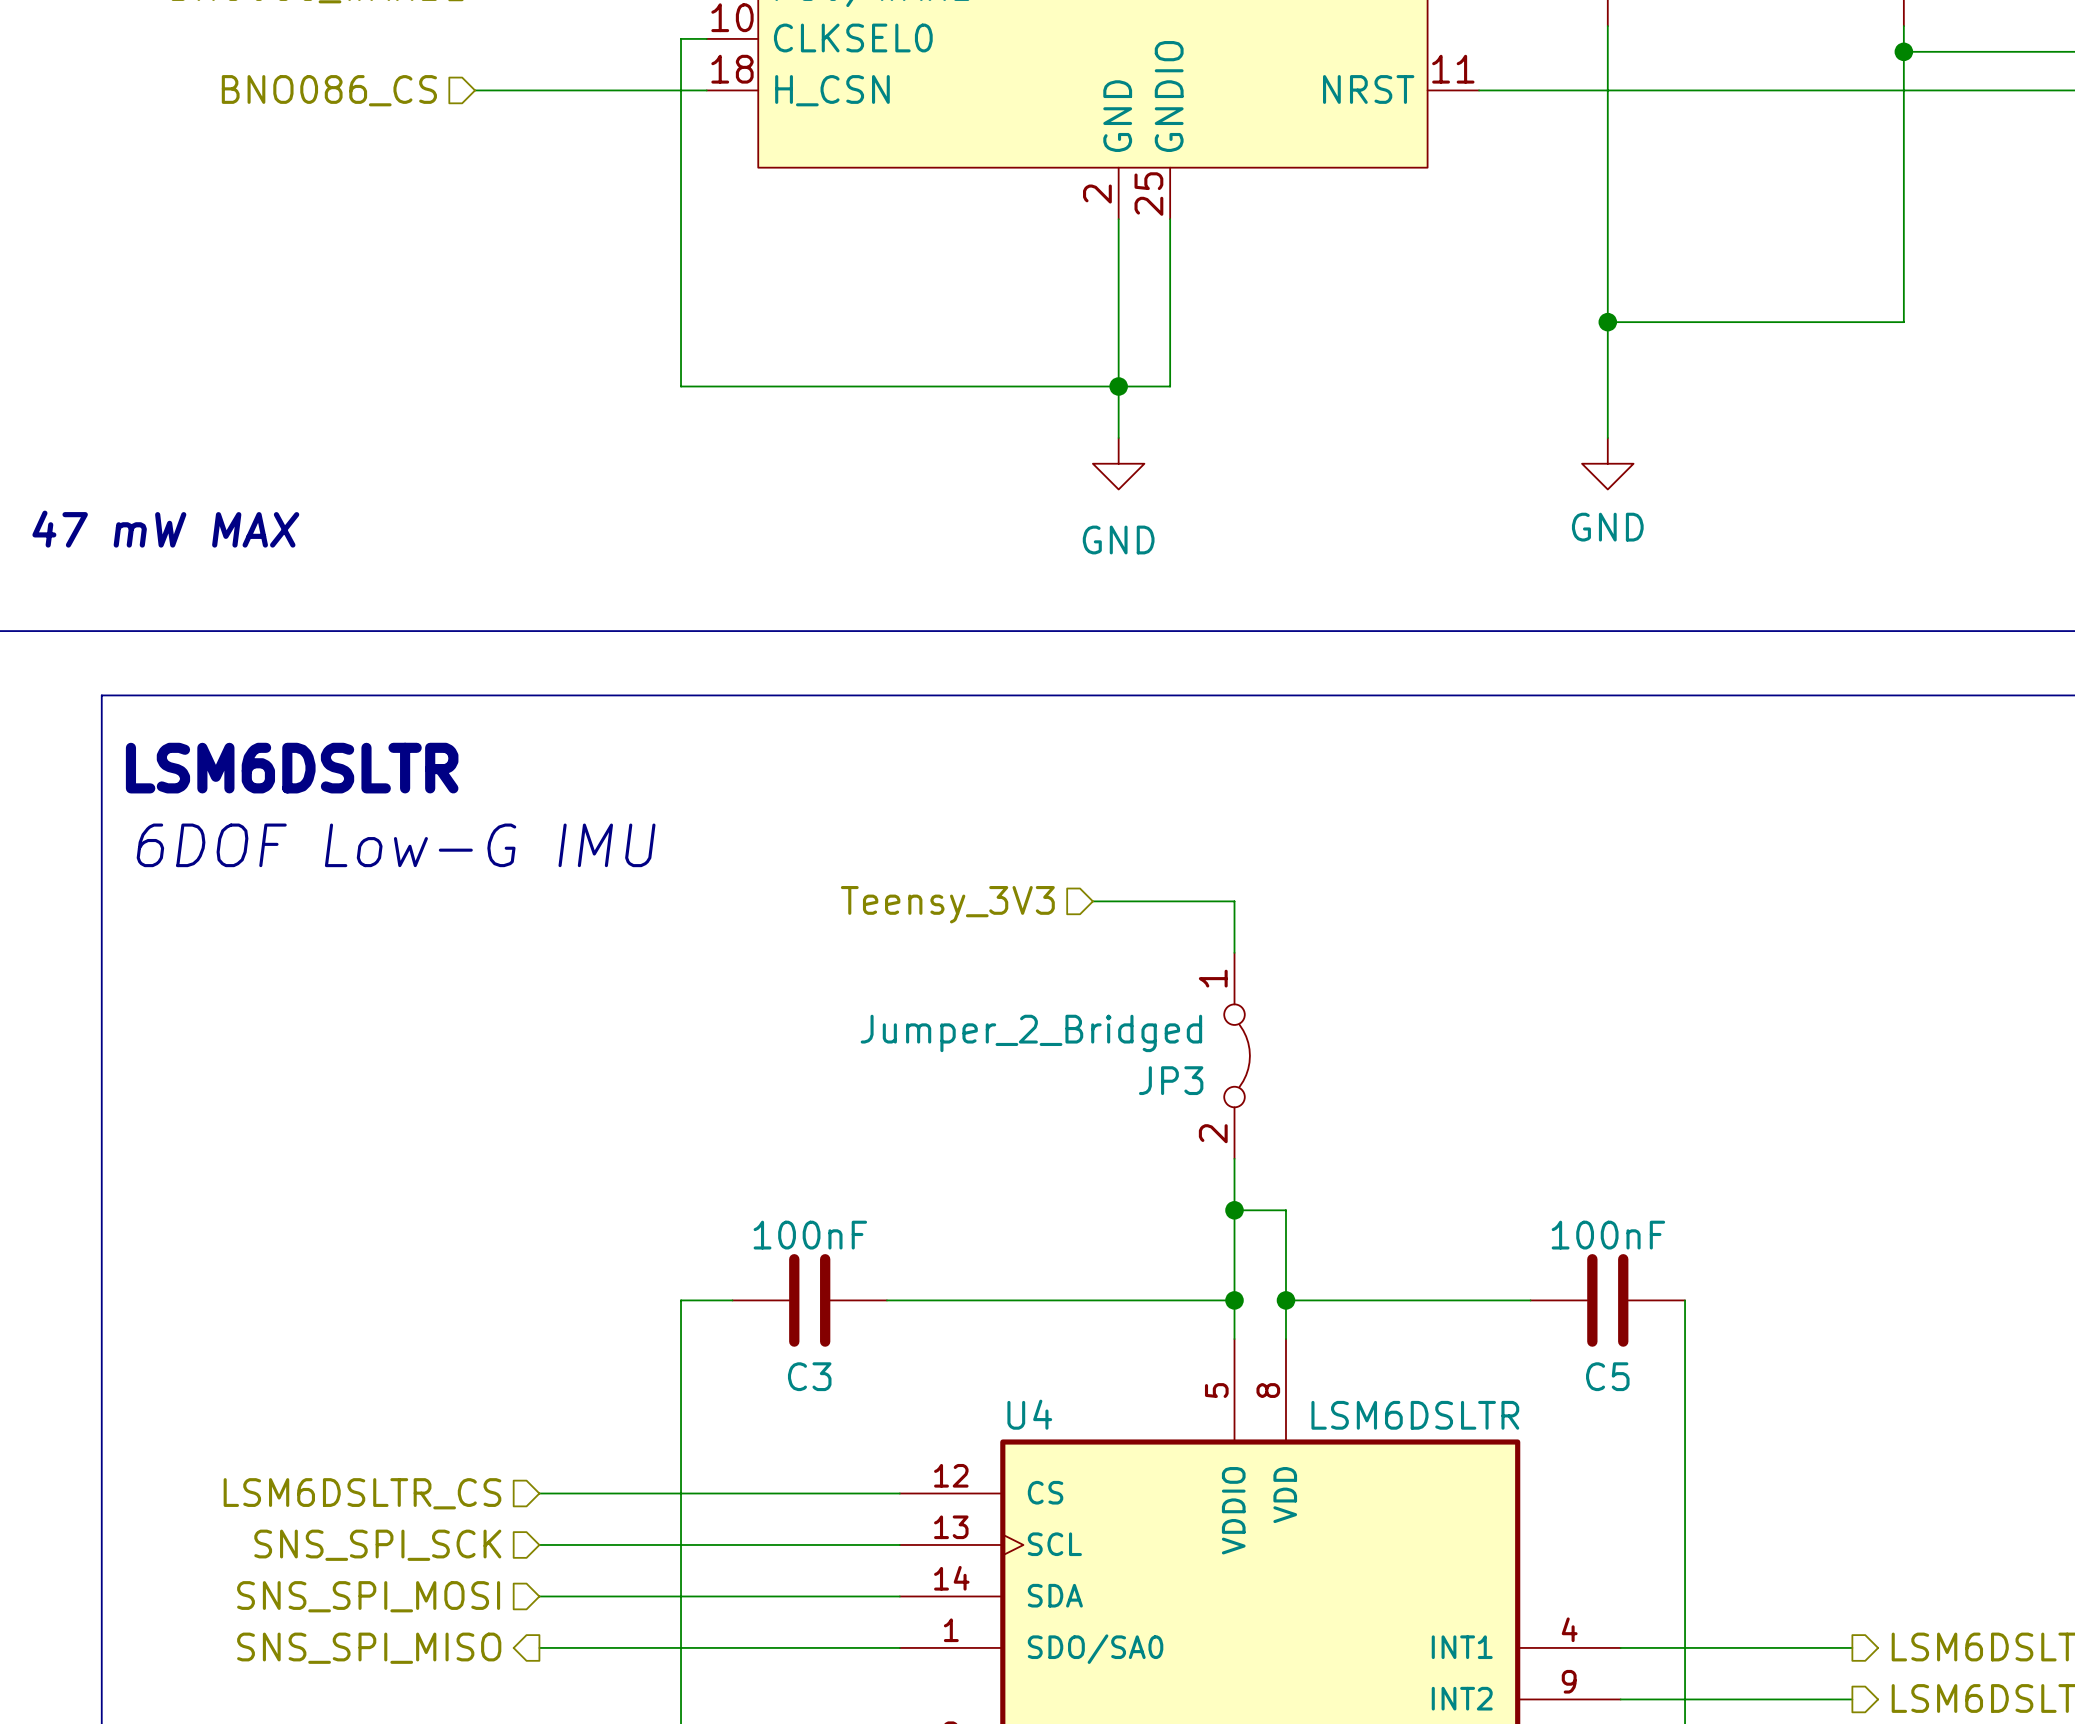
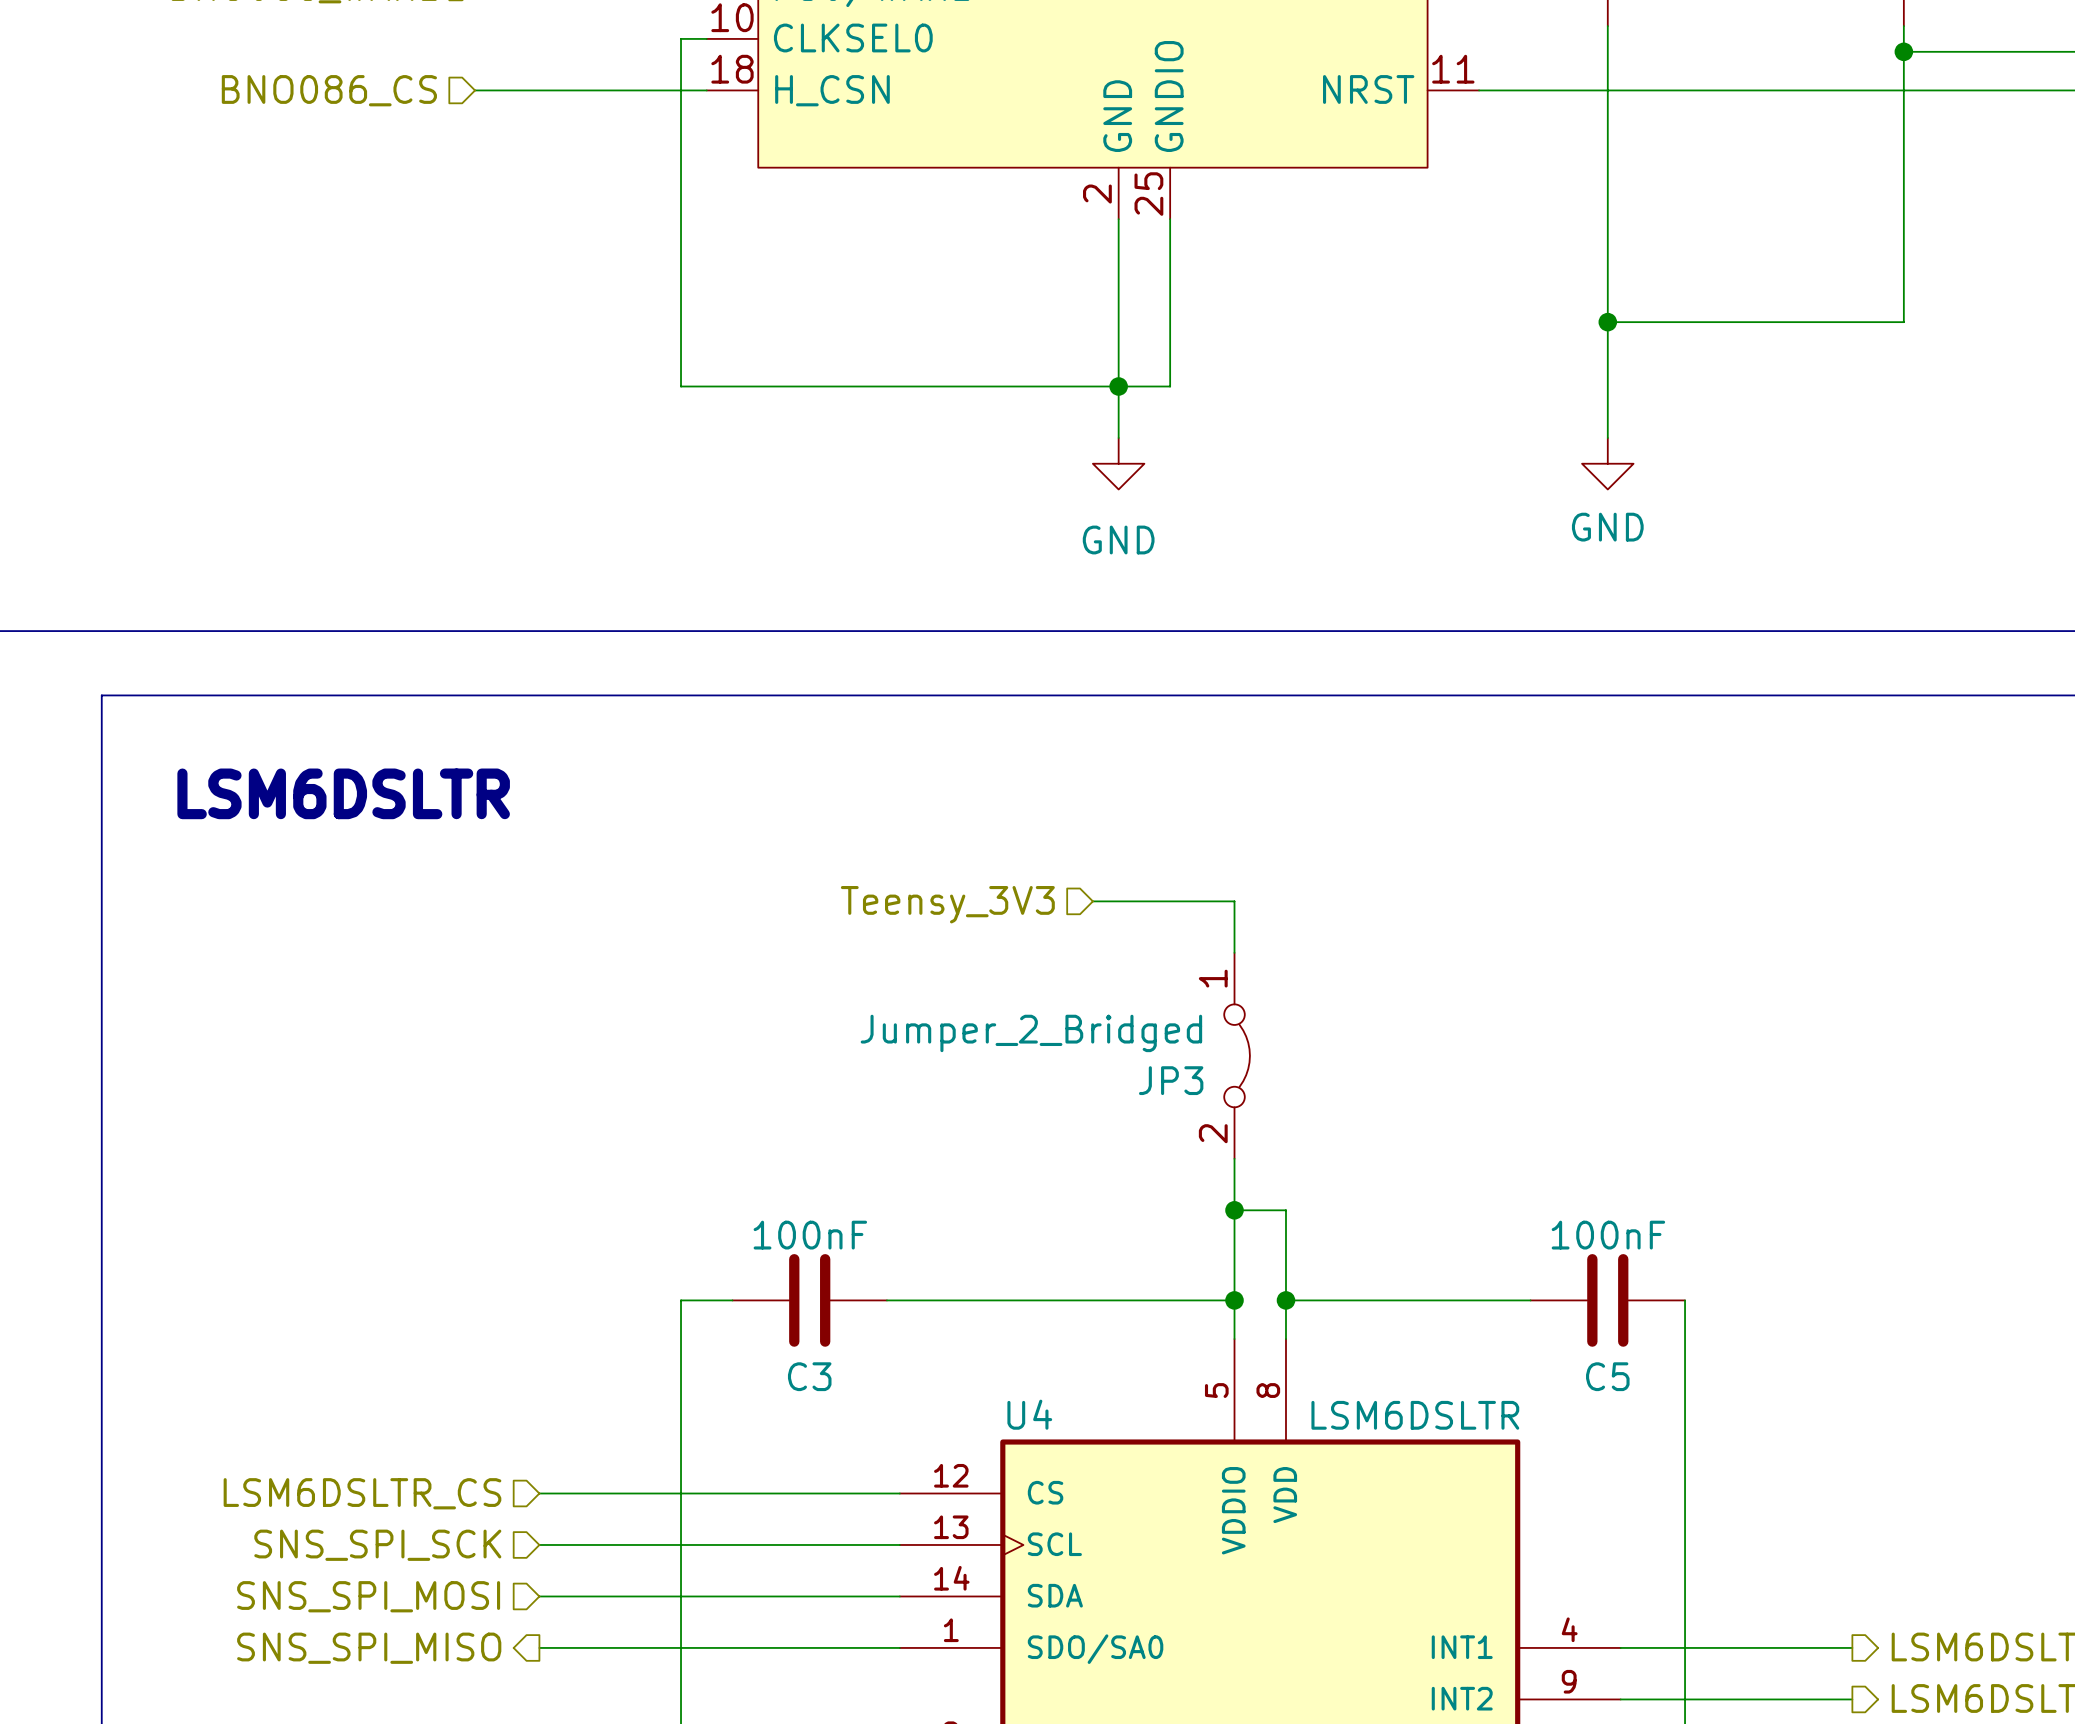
text: 47 mW MAX (165, 529) -> none
text position: LSM6DSLTR (292, 768) -> LSM6DSLTR (343, 793)
text: 6DOF Low-G IMU (396, 845) -> none

